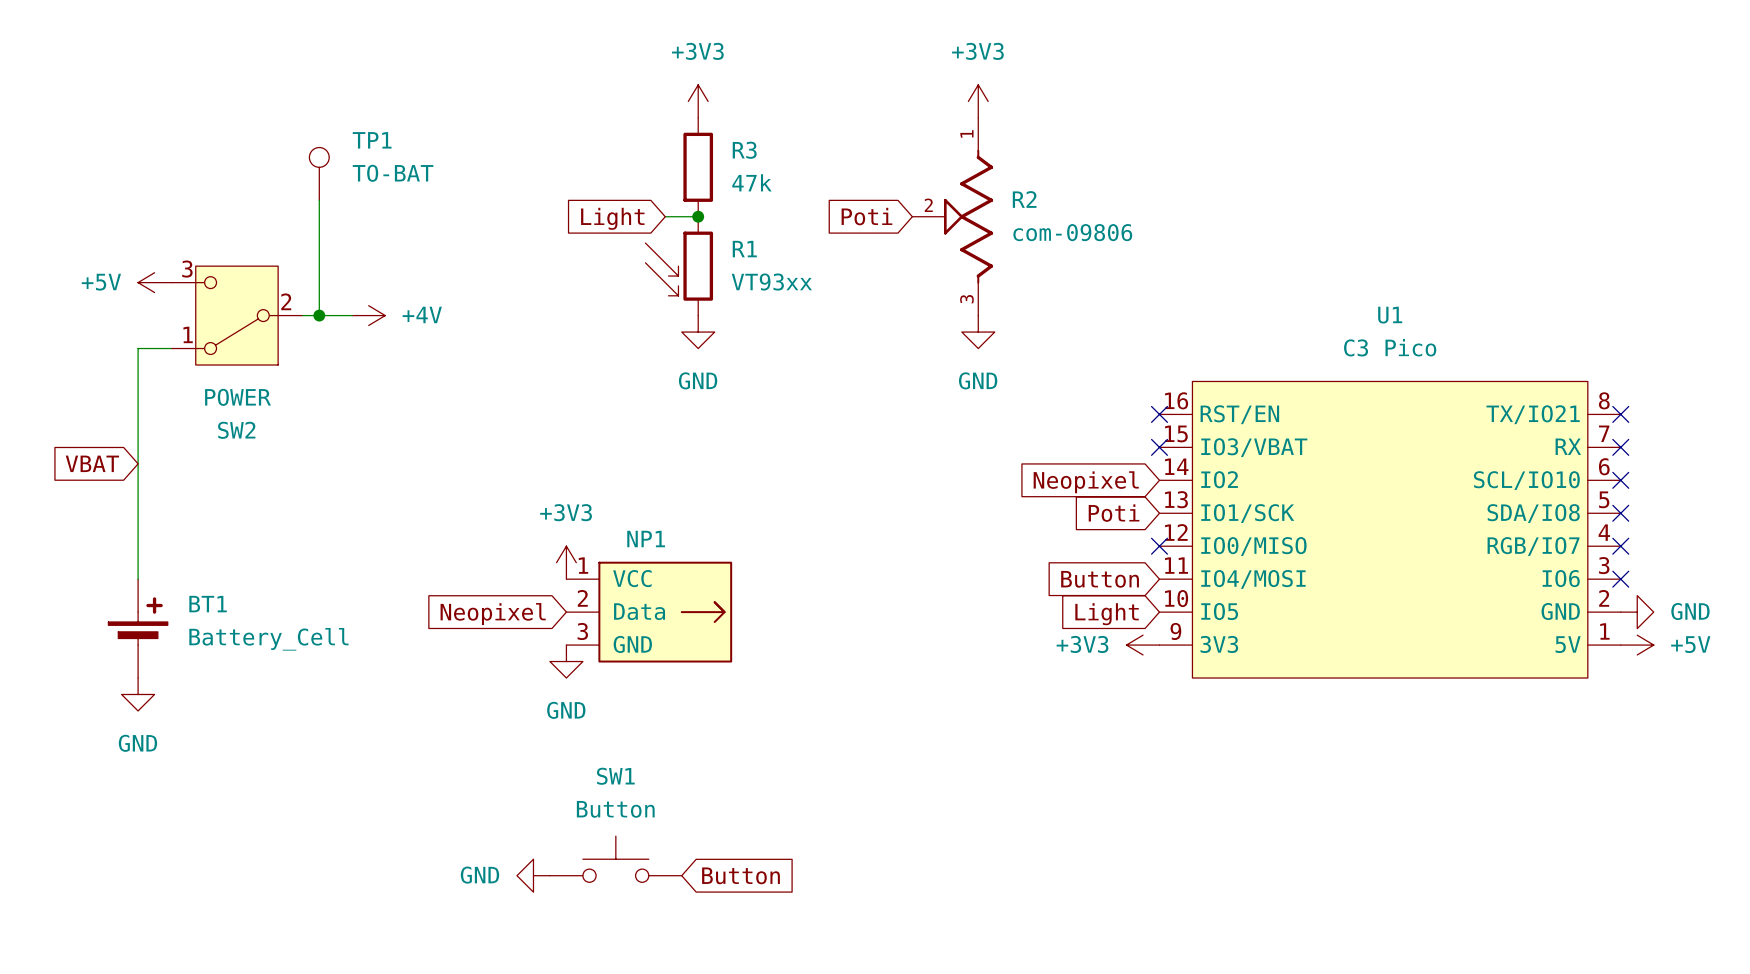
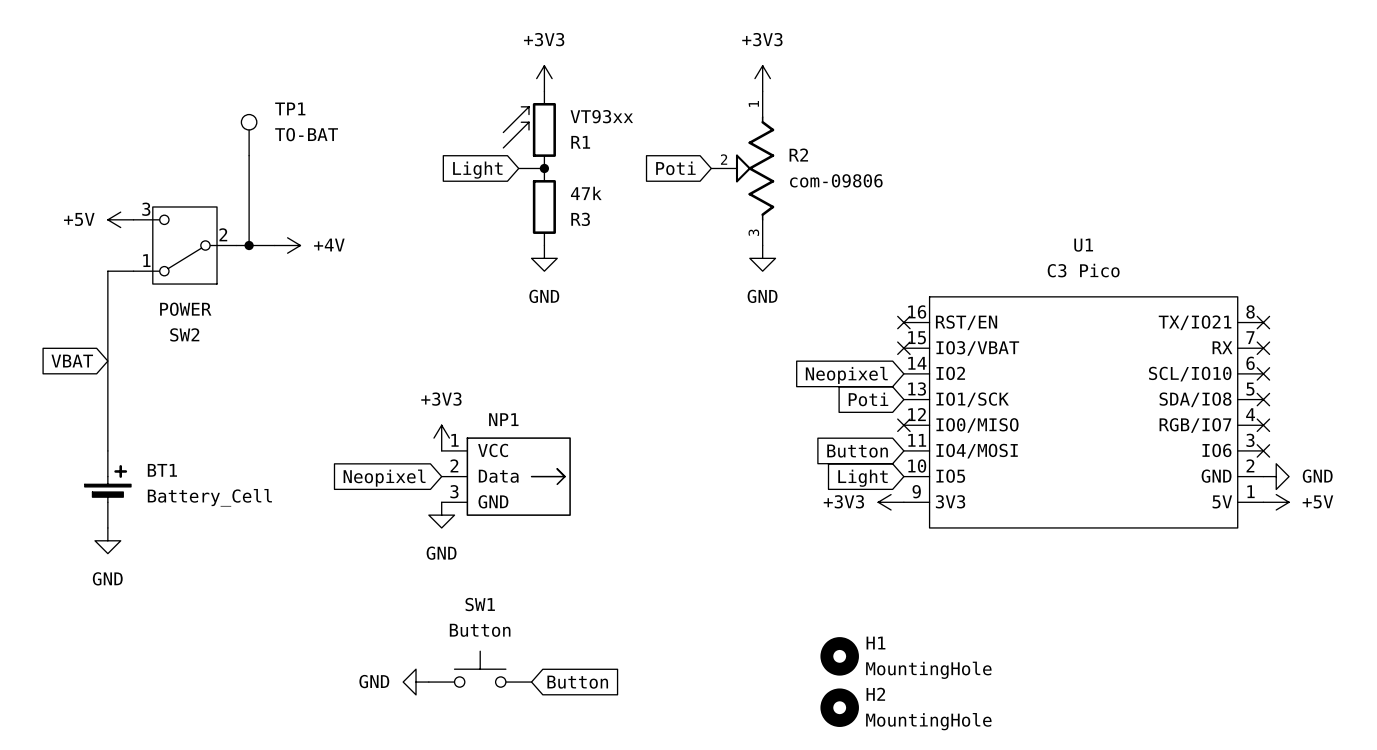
R3 name position: R3 (744, 150) -> R3 (580, 219)
R3 position: (698, 167) -> (544, 206)
R3 value position: 47k (751, 182) -> 47k (586, 193)
R1 flip: as is (679, 266) -> up-down (529, 129)
R1 position: (679, 266) -> (529, 129)
H1: none -> MountingHole (839, 656)
H2: none -> MountingHole (839, 707)

